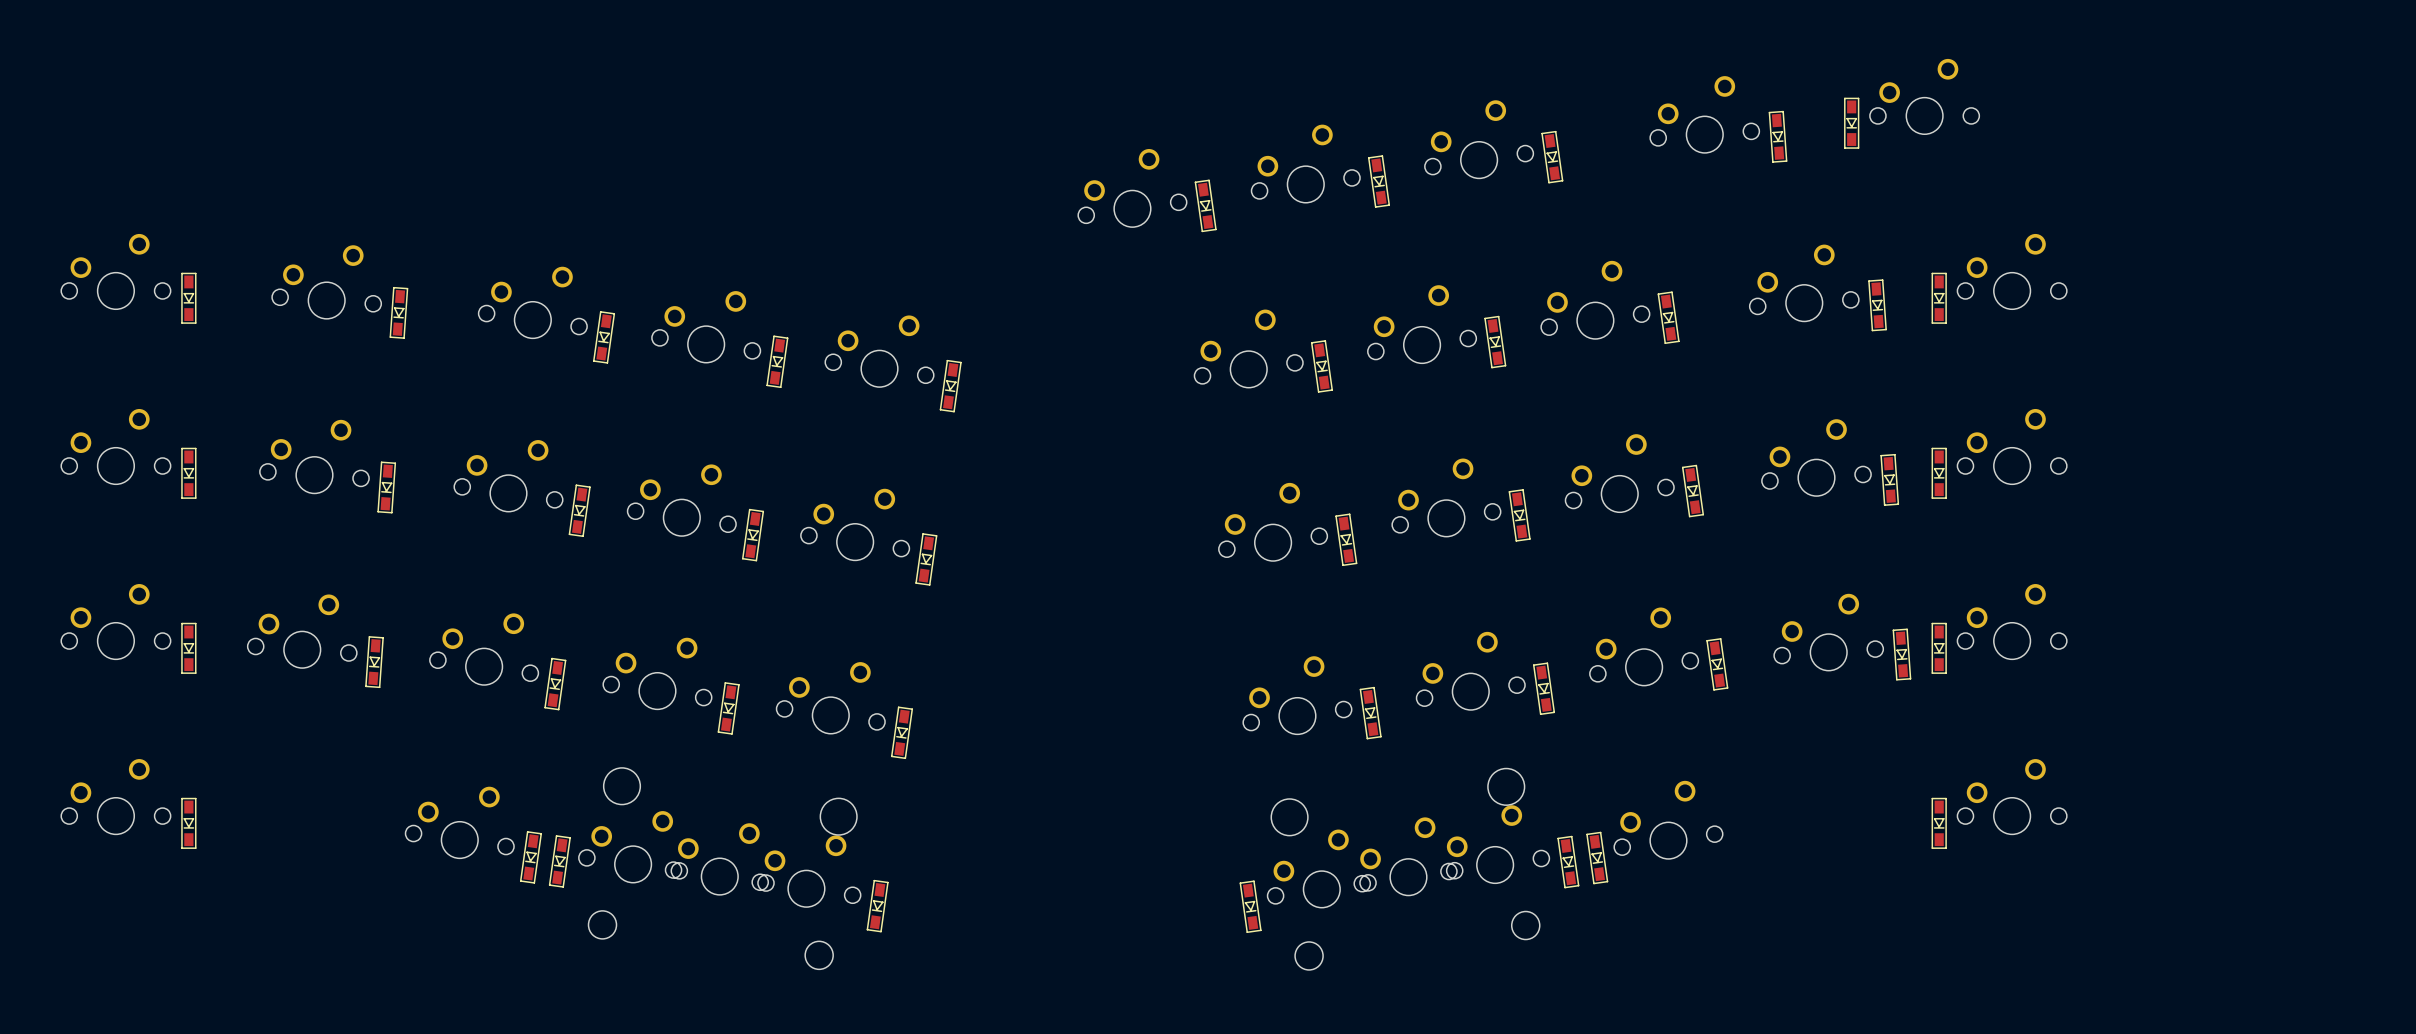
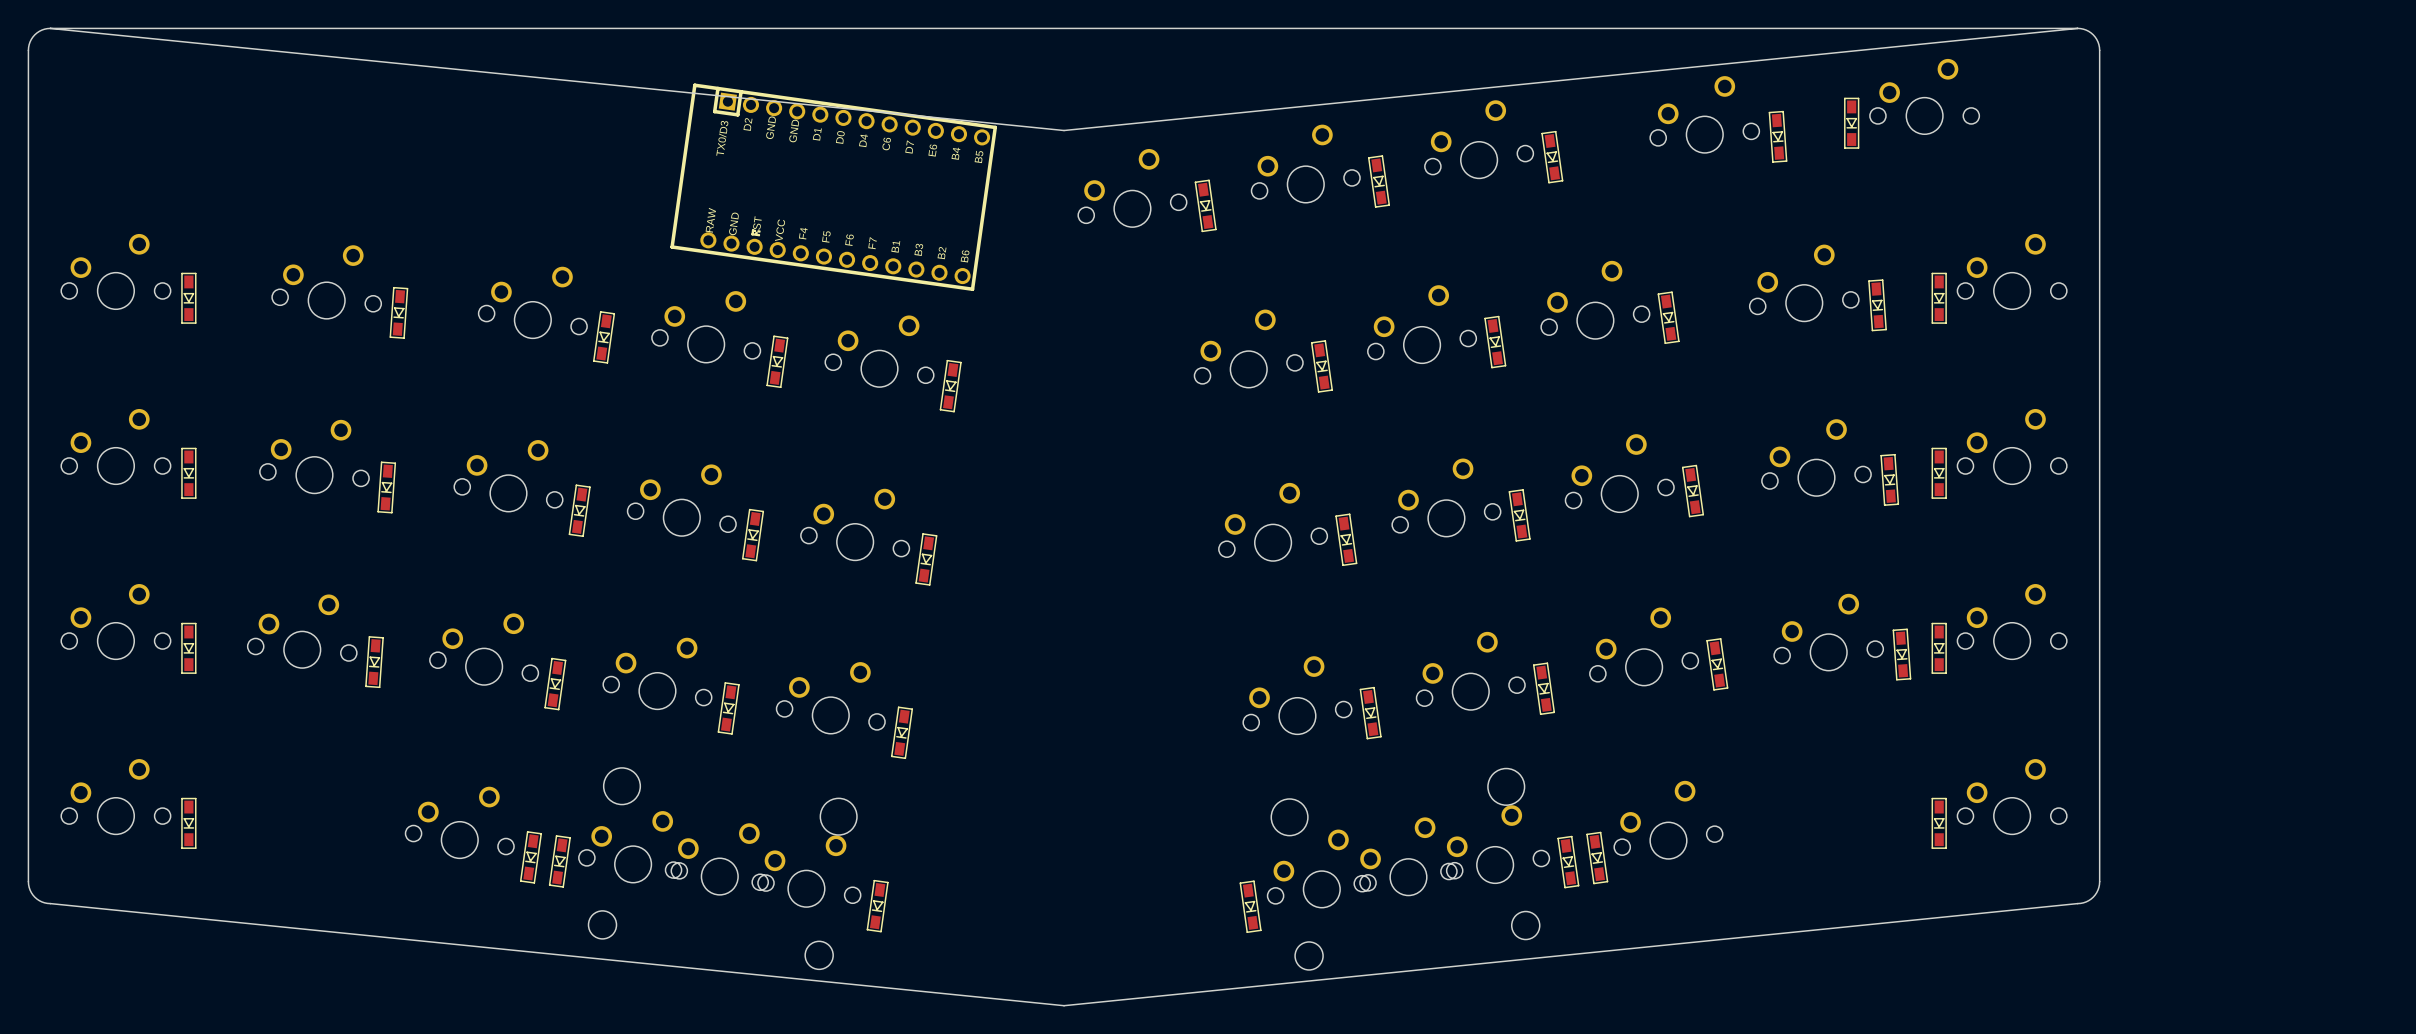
board edge: none -> (50, 28) (1064, 130) (2077, 28)
board edge: none -> (50, 28) (2077, 28)
board edge: none -> (50, 28) (41, 30) (34, 34) (30, 41) (28, 50) (28, 881) (30, 890) (34, 897) (41, 901) (50, 903)
board edge: none -> (2077, 28) (2086, 30) (2093, 34) (2097, 41) (2099, 50) (2099, 881) (2095, 895) (2086, 901) (1064, 1005) (50, 903)
part: none -> (833, 187)

